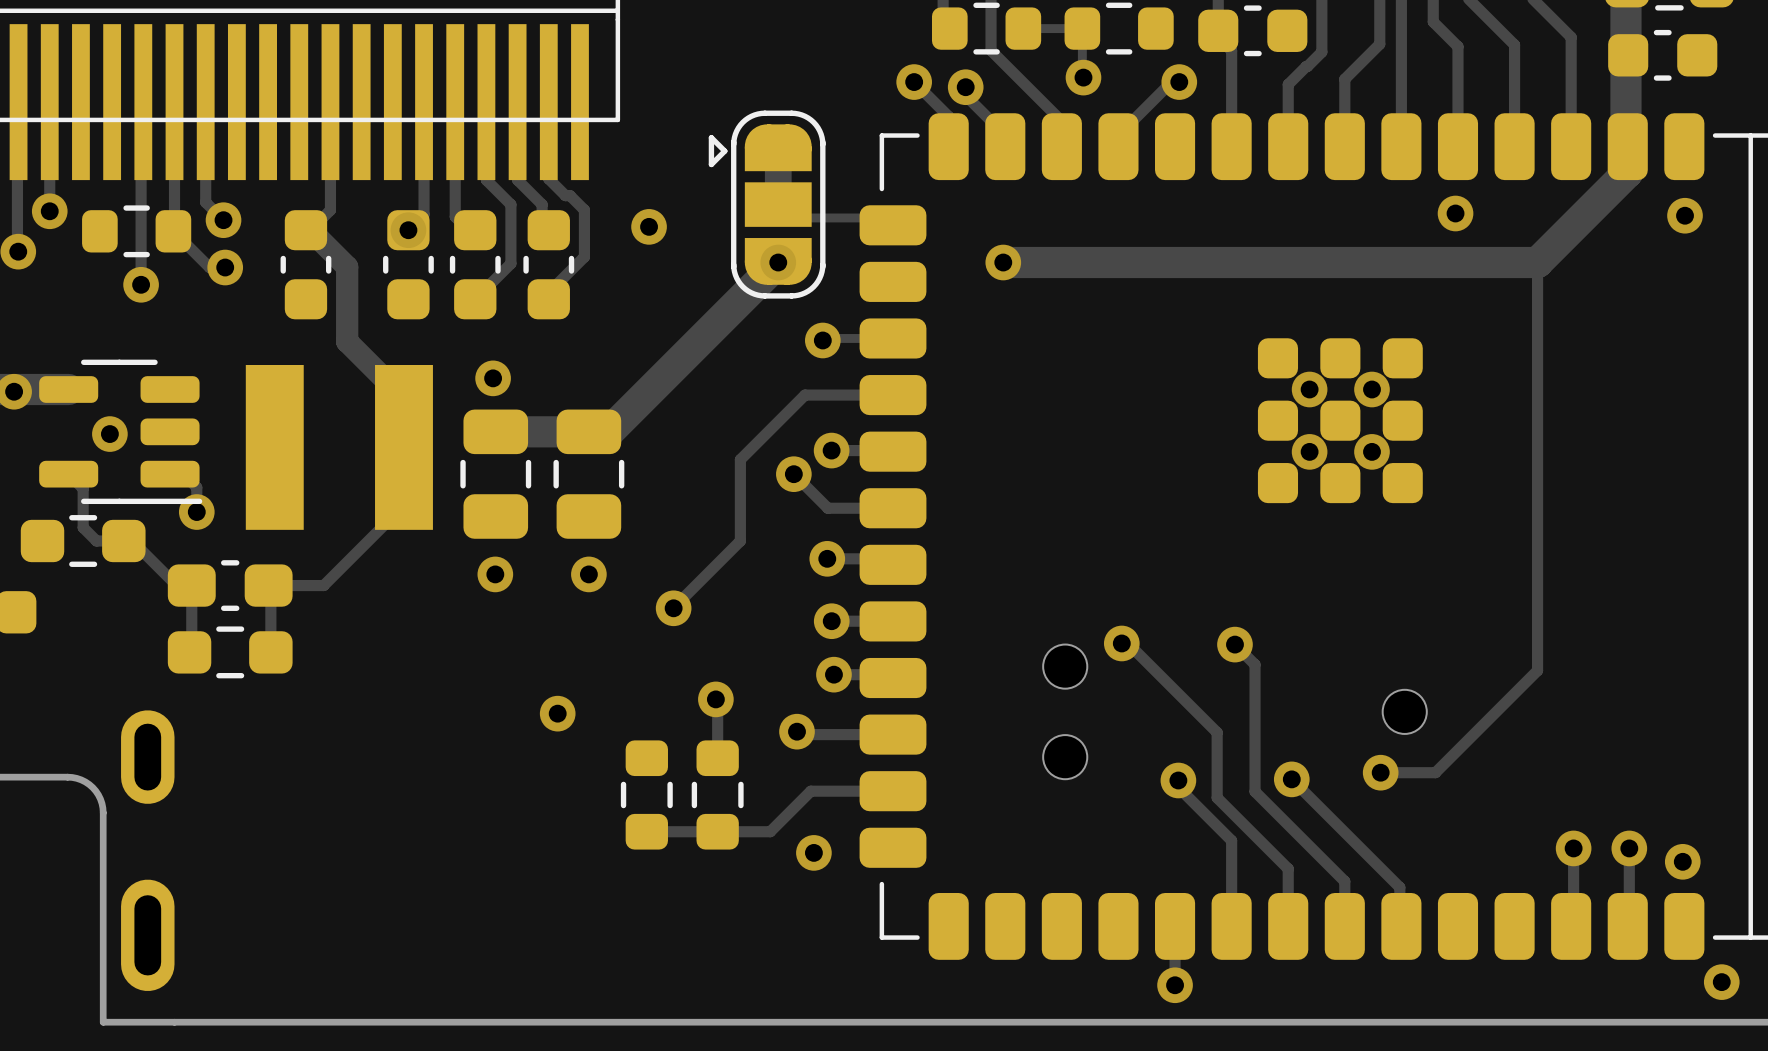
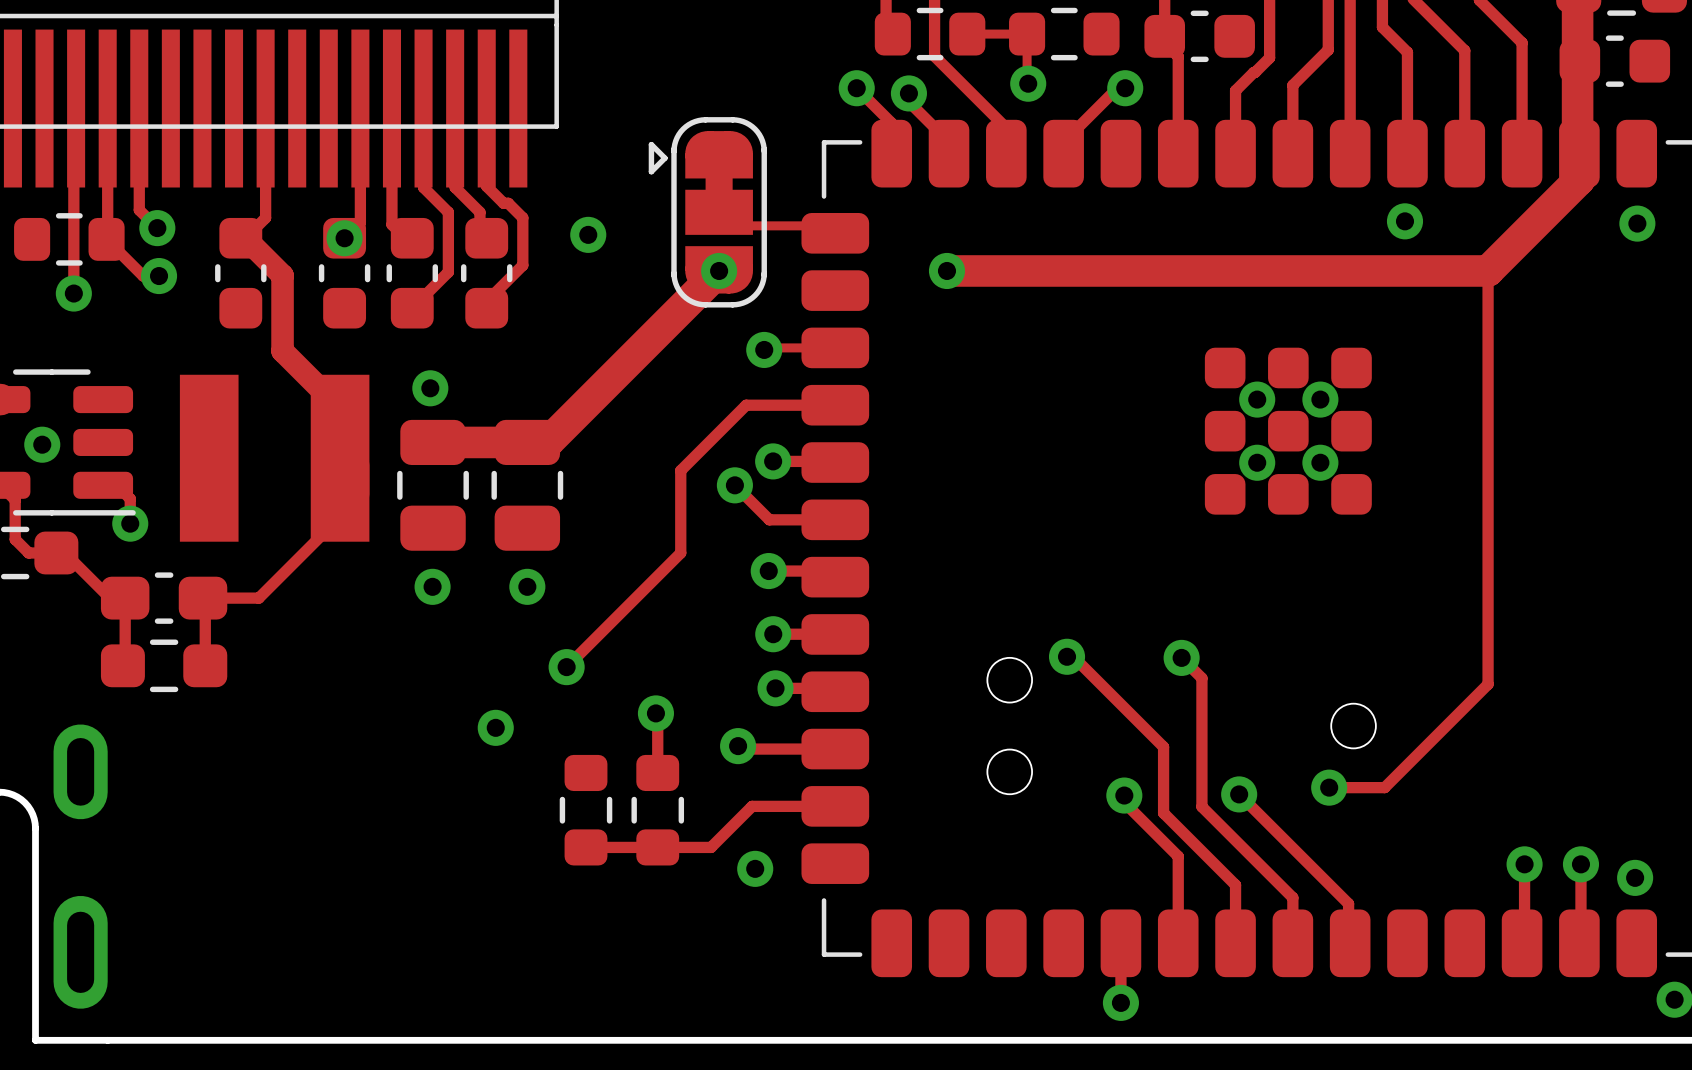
track: none -> (613, 620) (566, 667)
via position: (673, 608) -> (566, 667)

